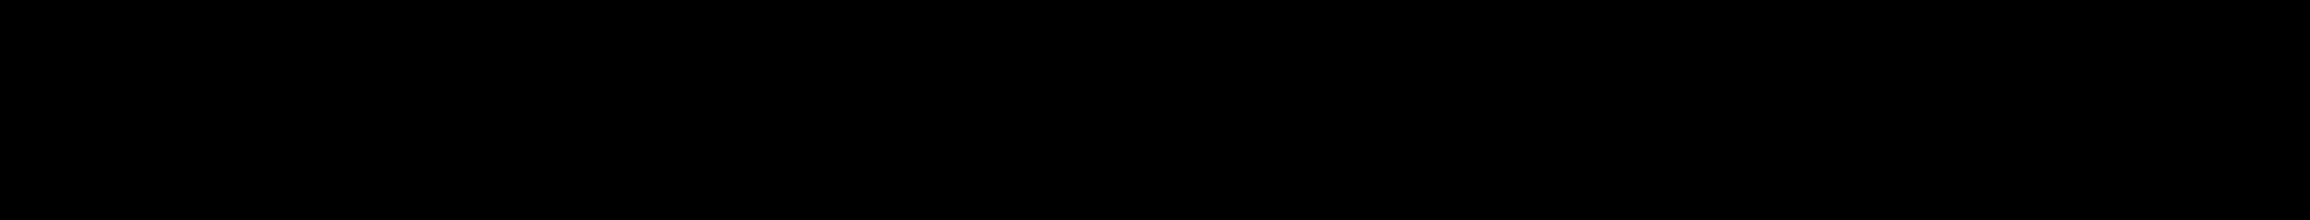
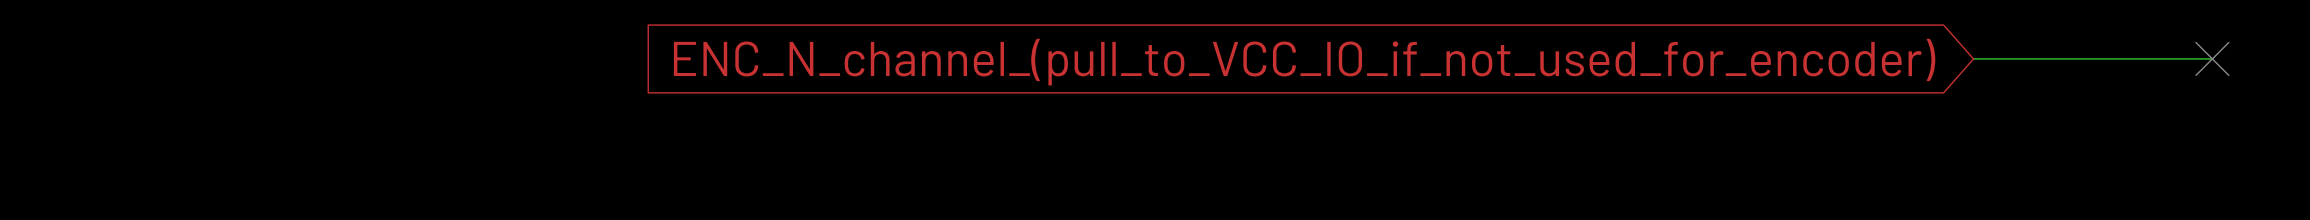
wire: none -> (1973, 58) (2212, 58)
no-connect mark: none -> (2212, 58)
global label: none -> ENC_N_channel_(pull_to_VCC_IO_if_not_used_for_encoder) (1304, 62)

